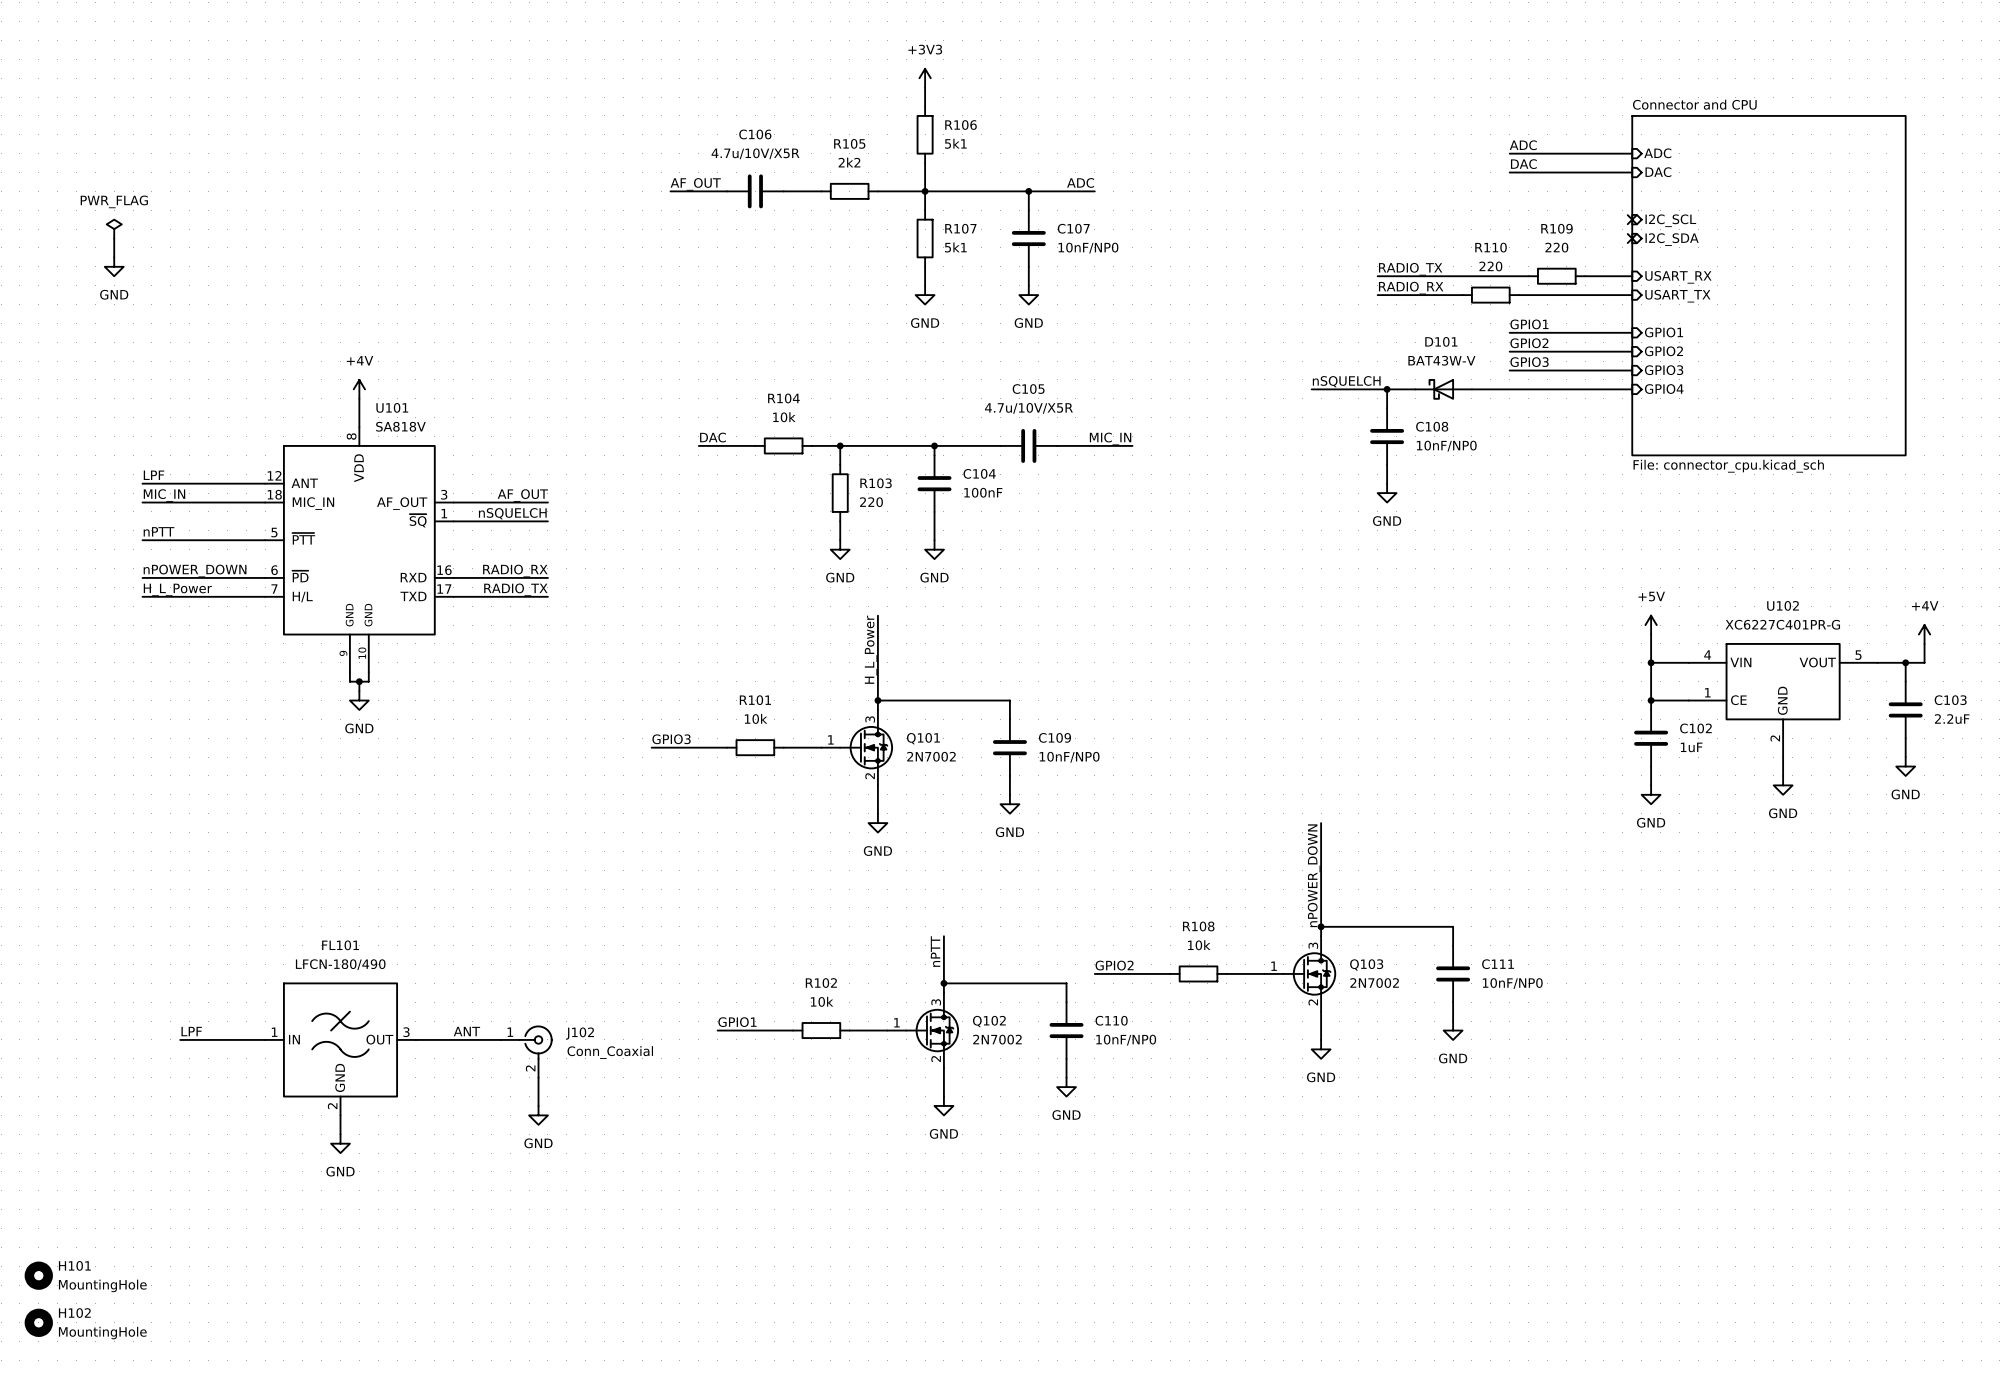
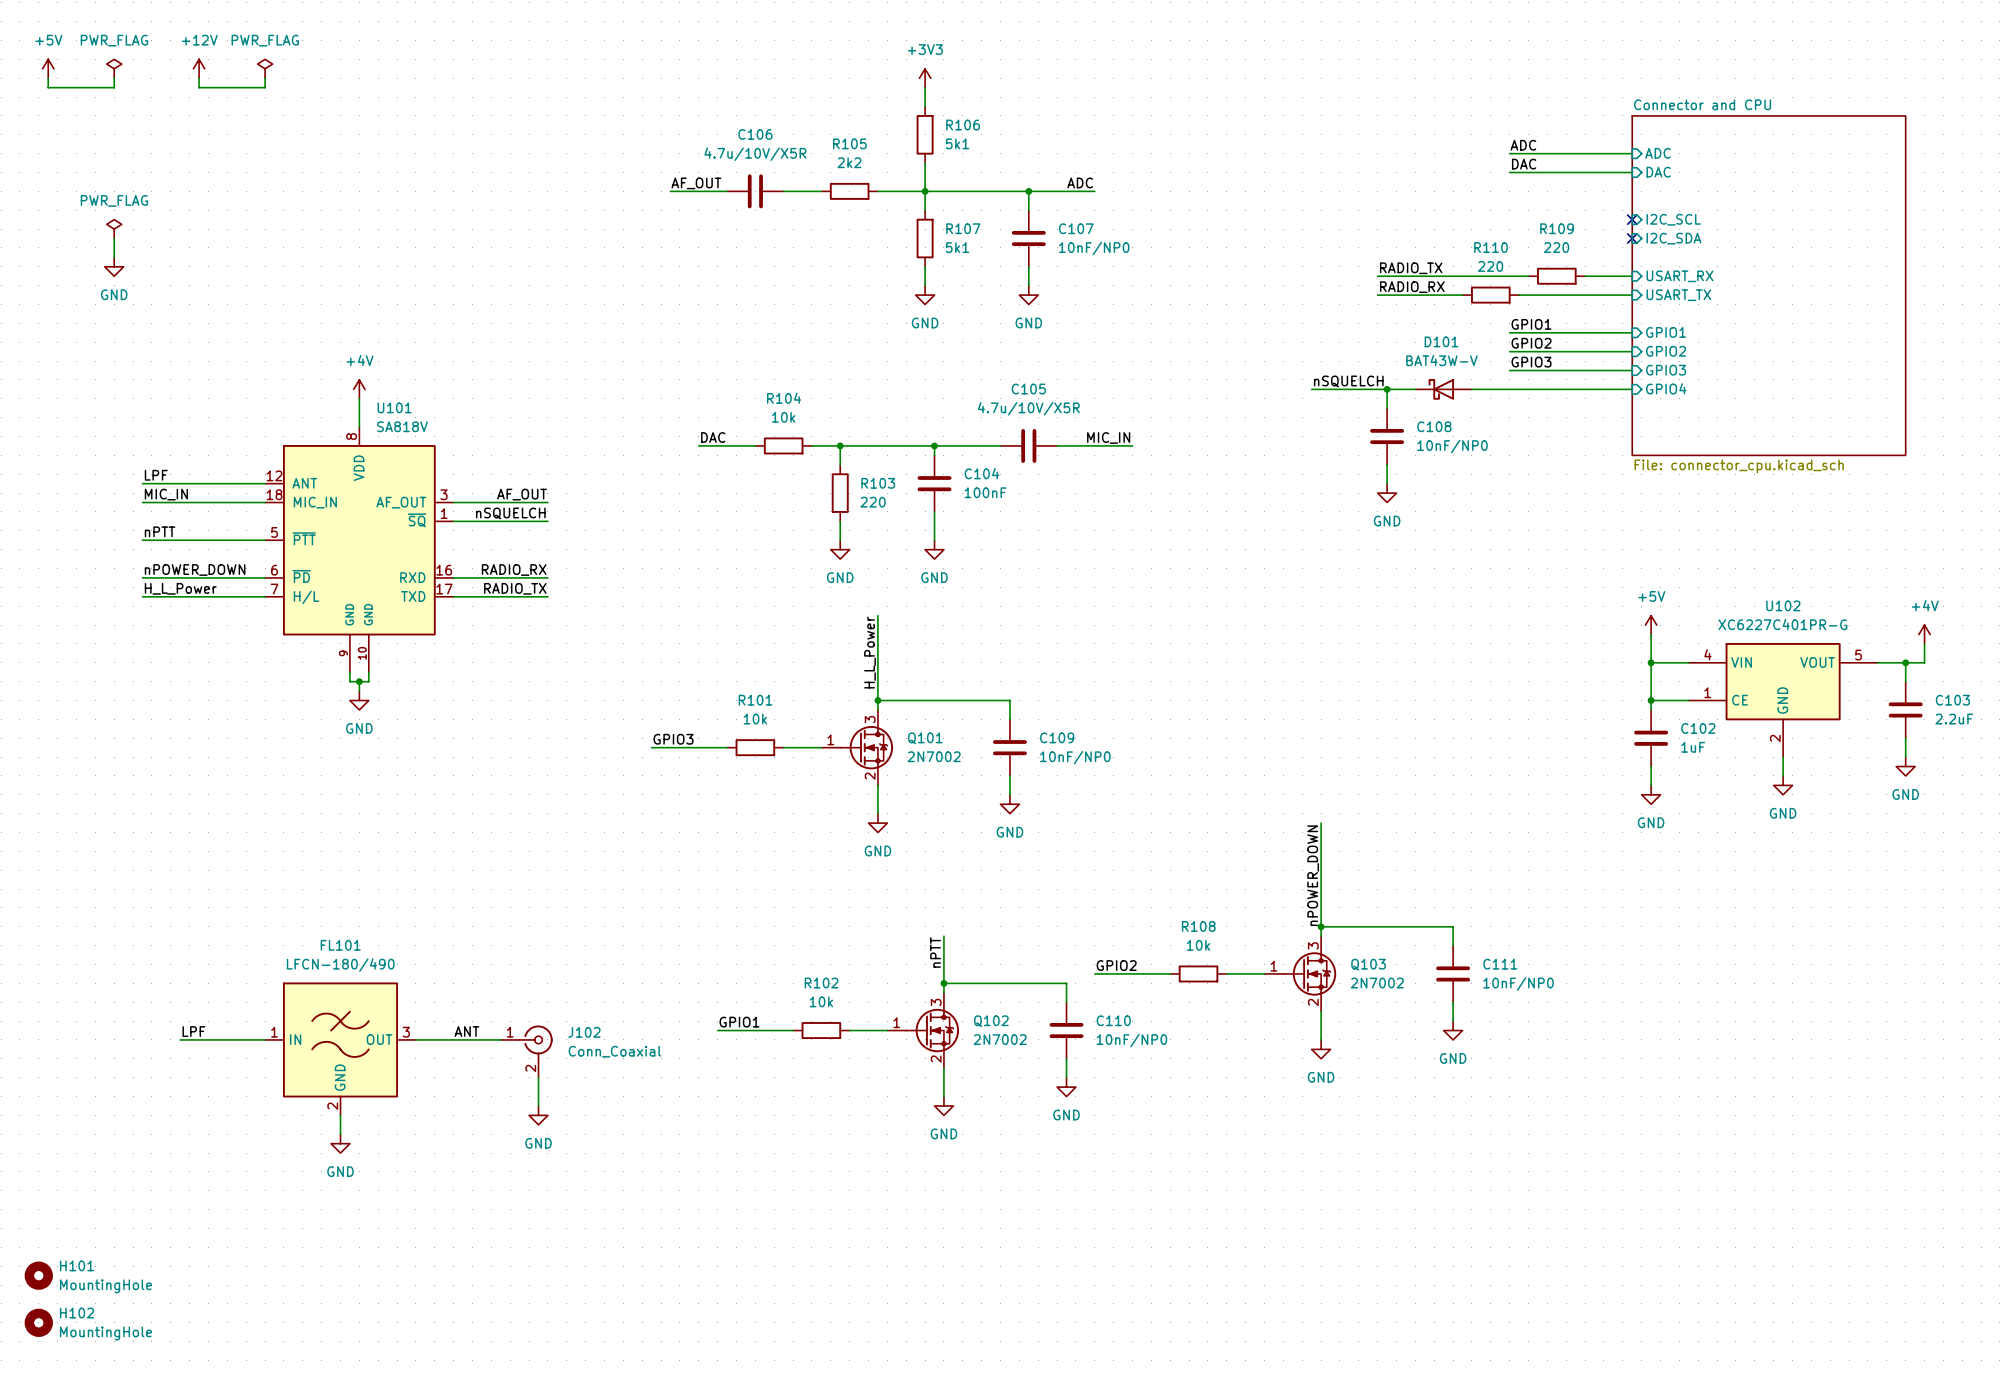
power symbol: none -> +5V (48, 68)
power symbol: none -> PWR_FLAG (114, 68)
power symbol: none -> +12V (199, 68)
power symbol: none -> PWR_FLAG (265, 68)
wire: none -> (48, 78) (48, 87) (114, 87) (114, 78)
wire: none -> (199, 78) (199, 87) (265, 87) (265, 78)

